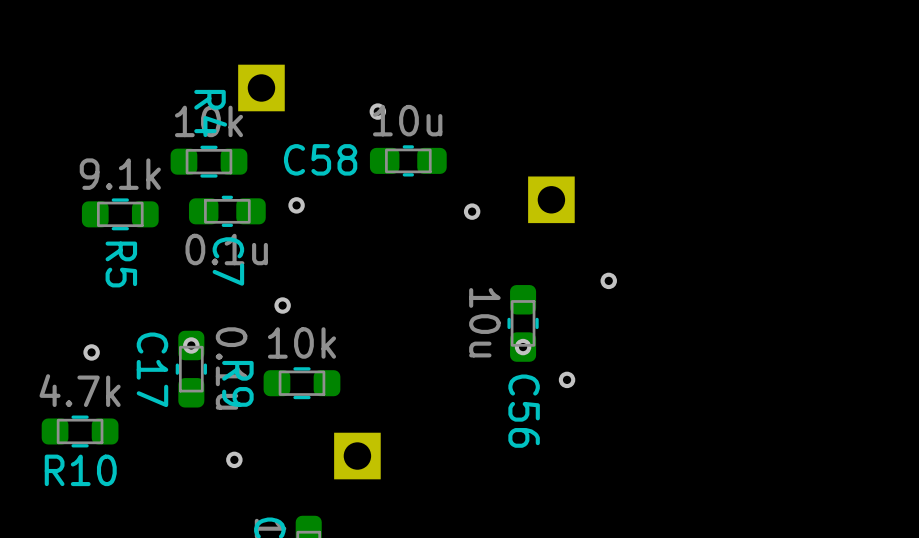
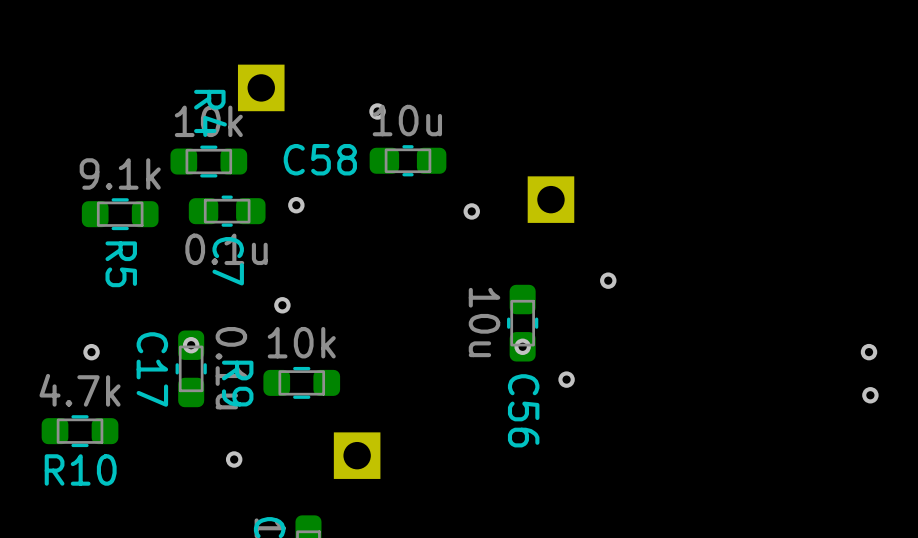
via: none -> (869, 352)
via: none -> (870, 395)

